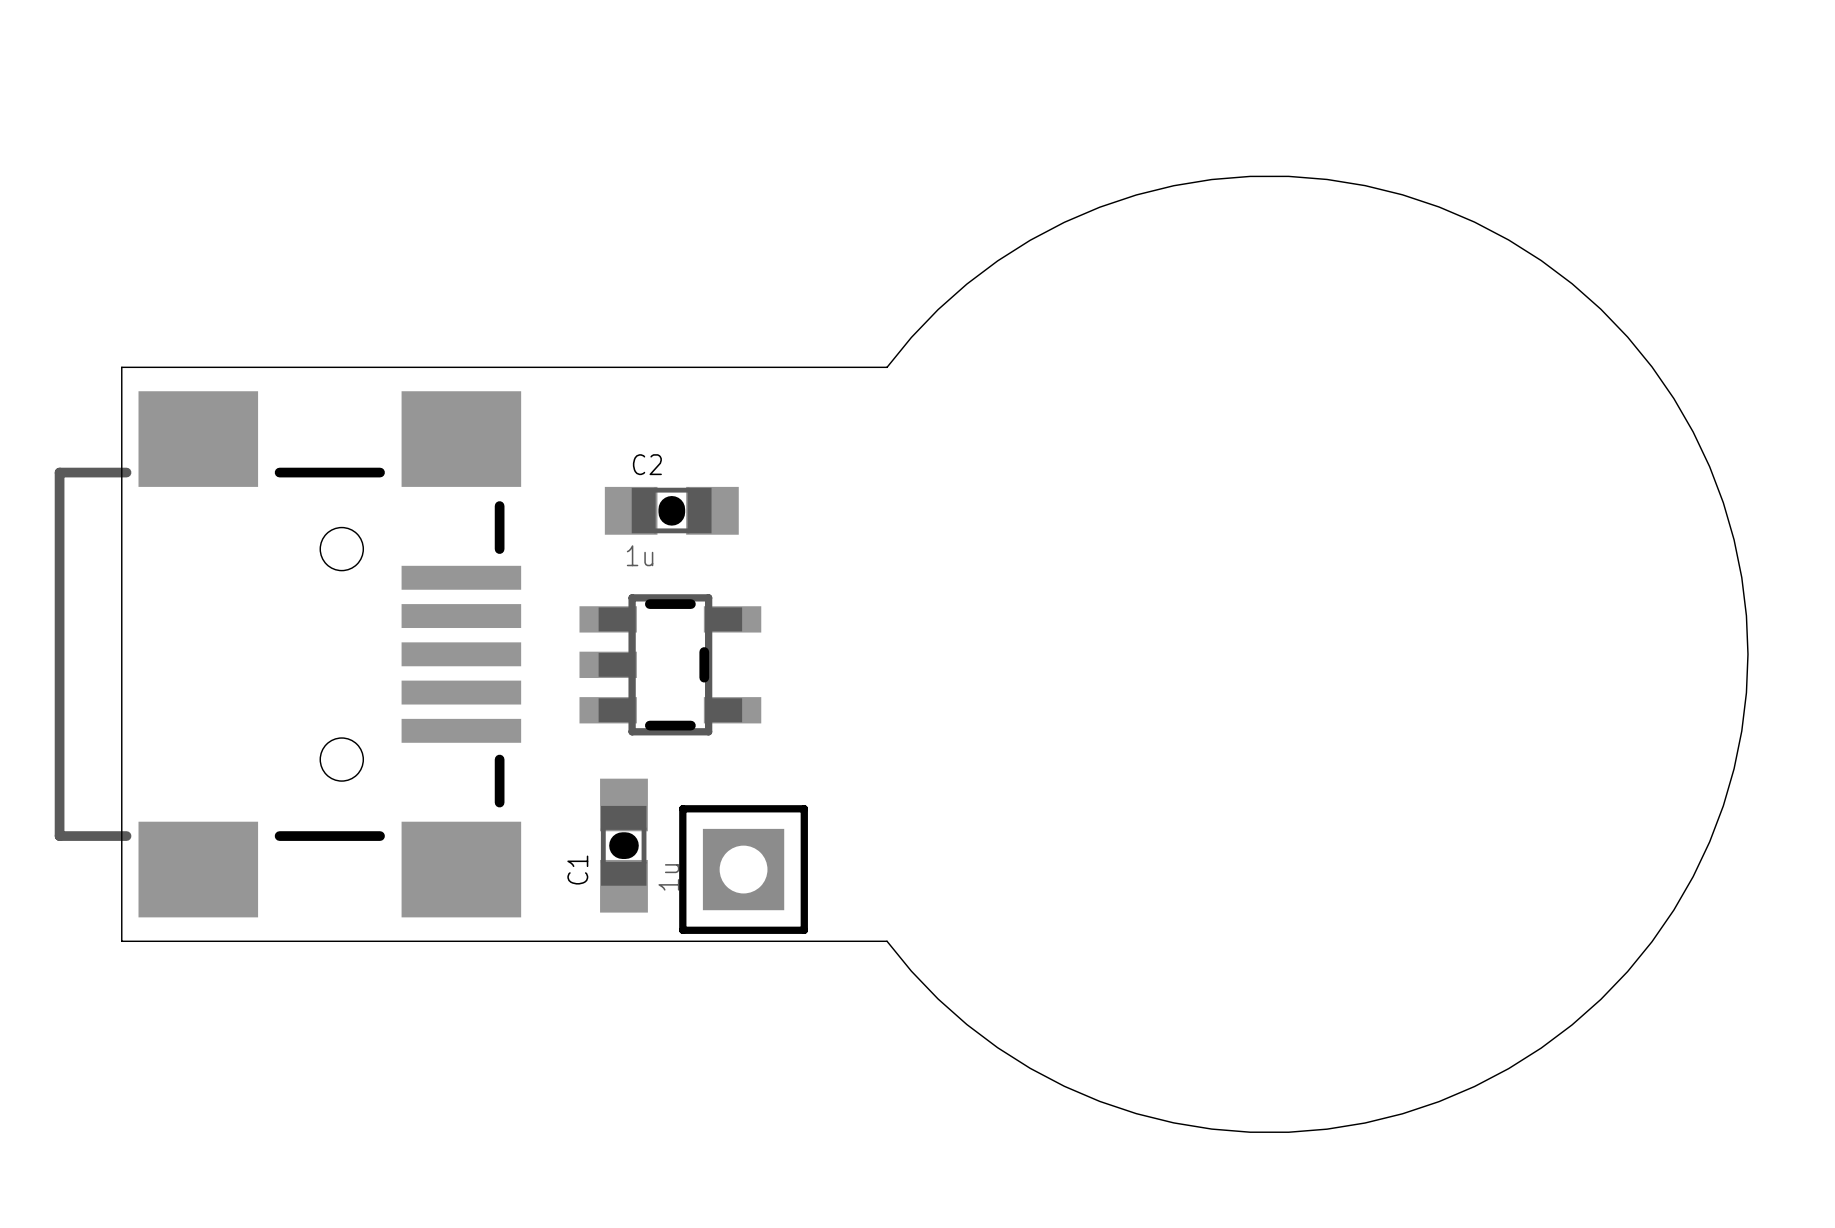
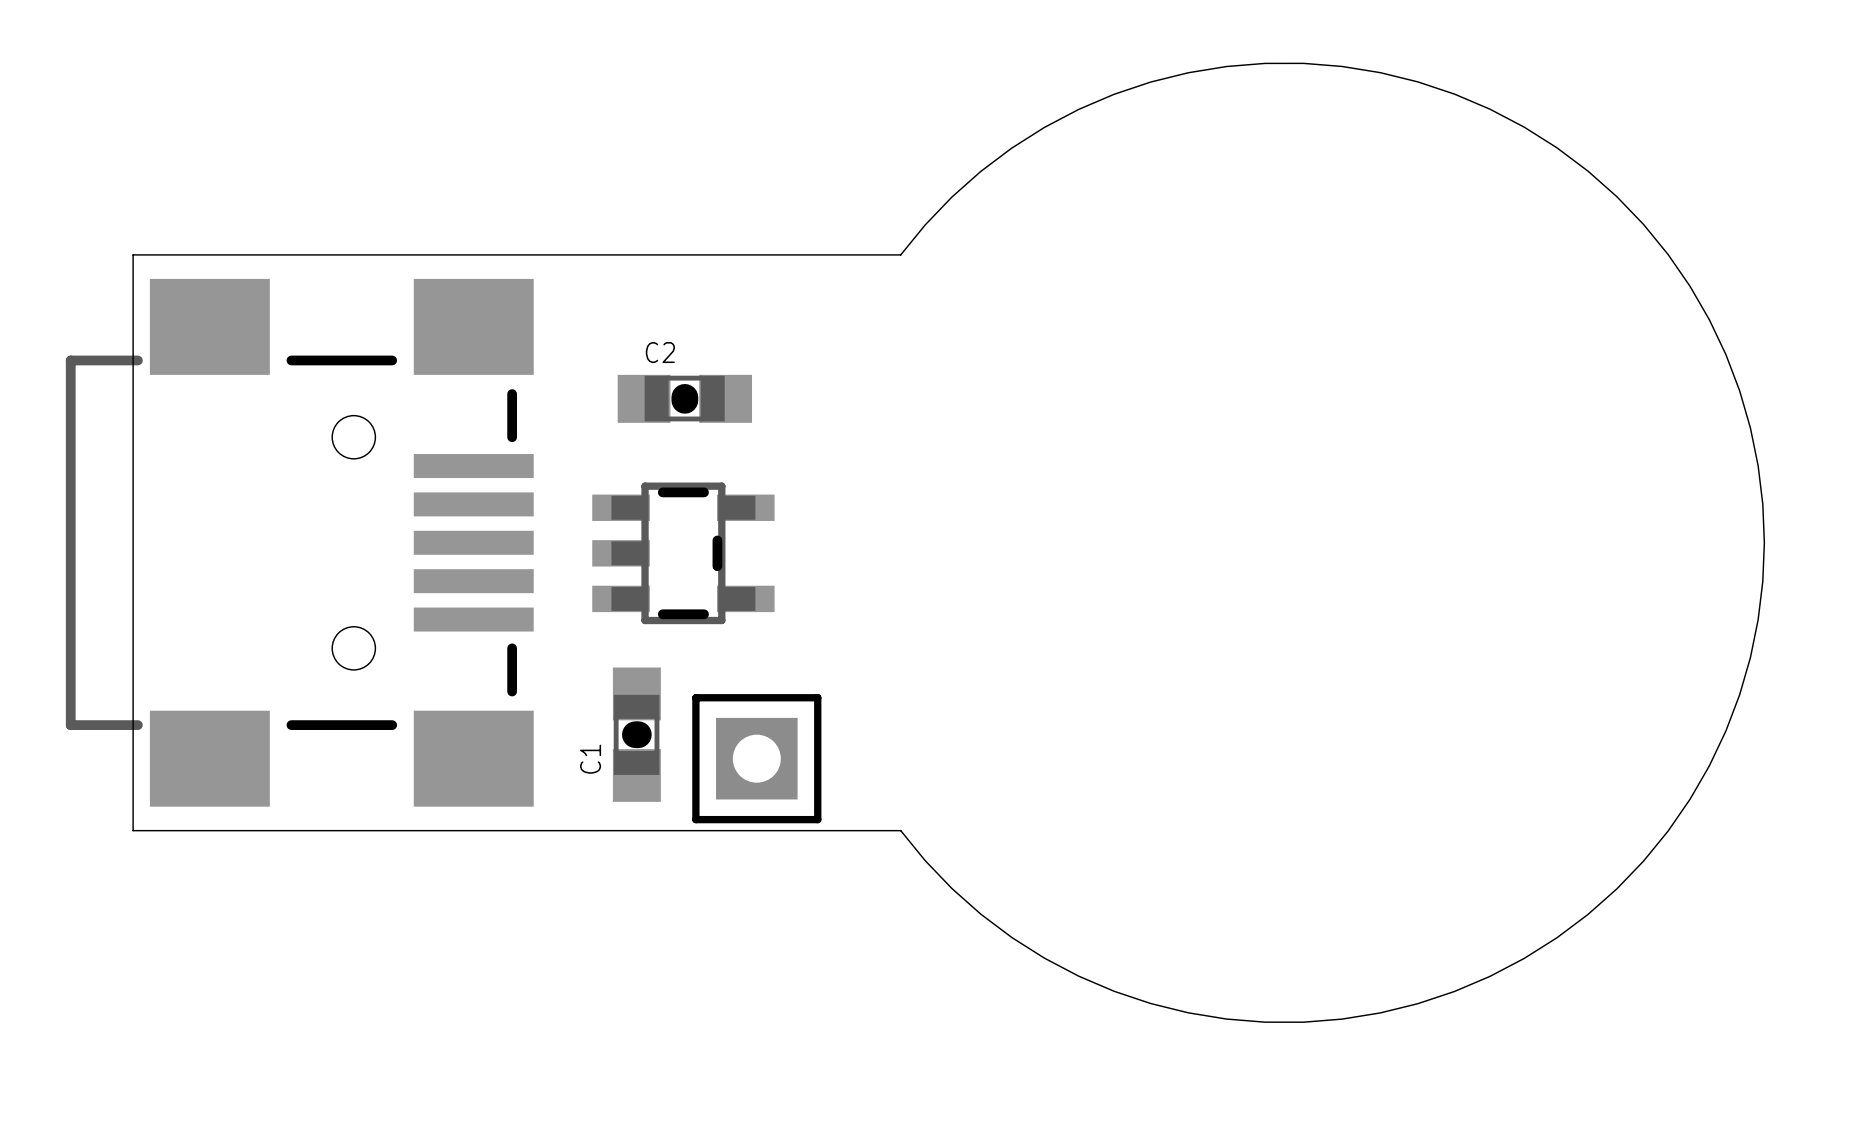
C2 value: 1u (640, 555) -> none
C1 value: 1u (668, 877) -> none

